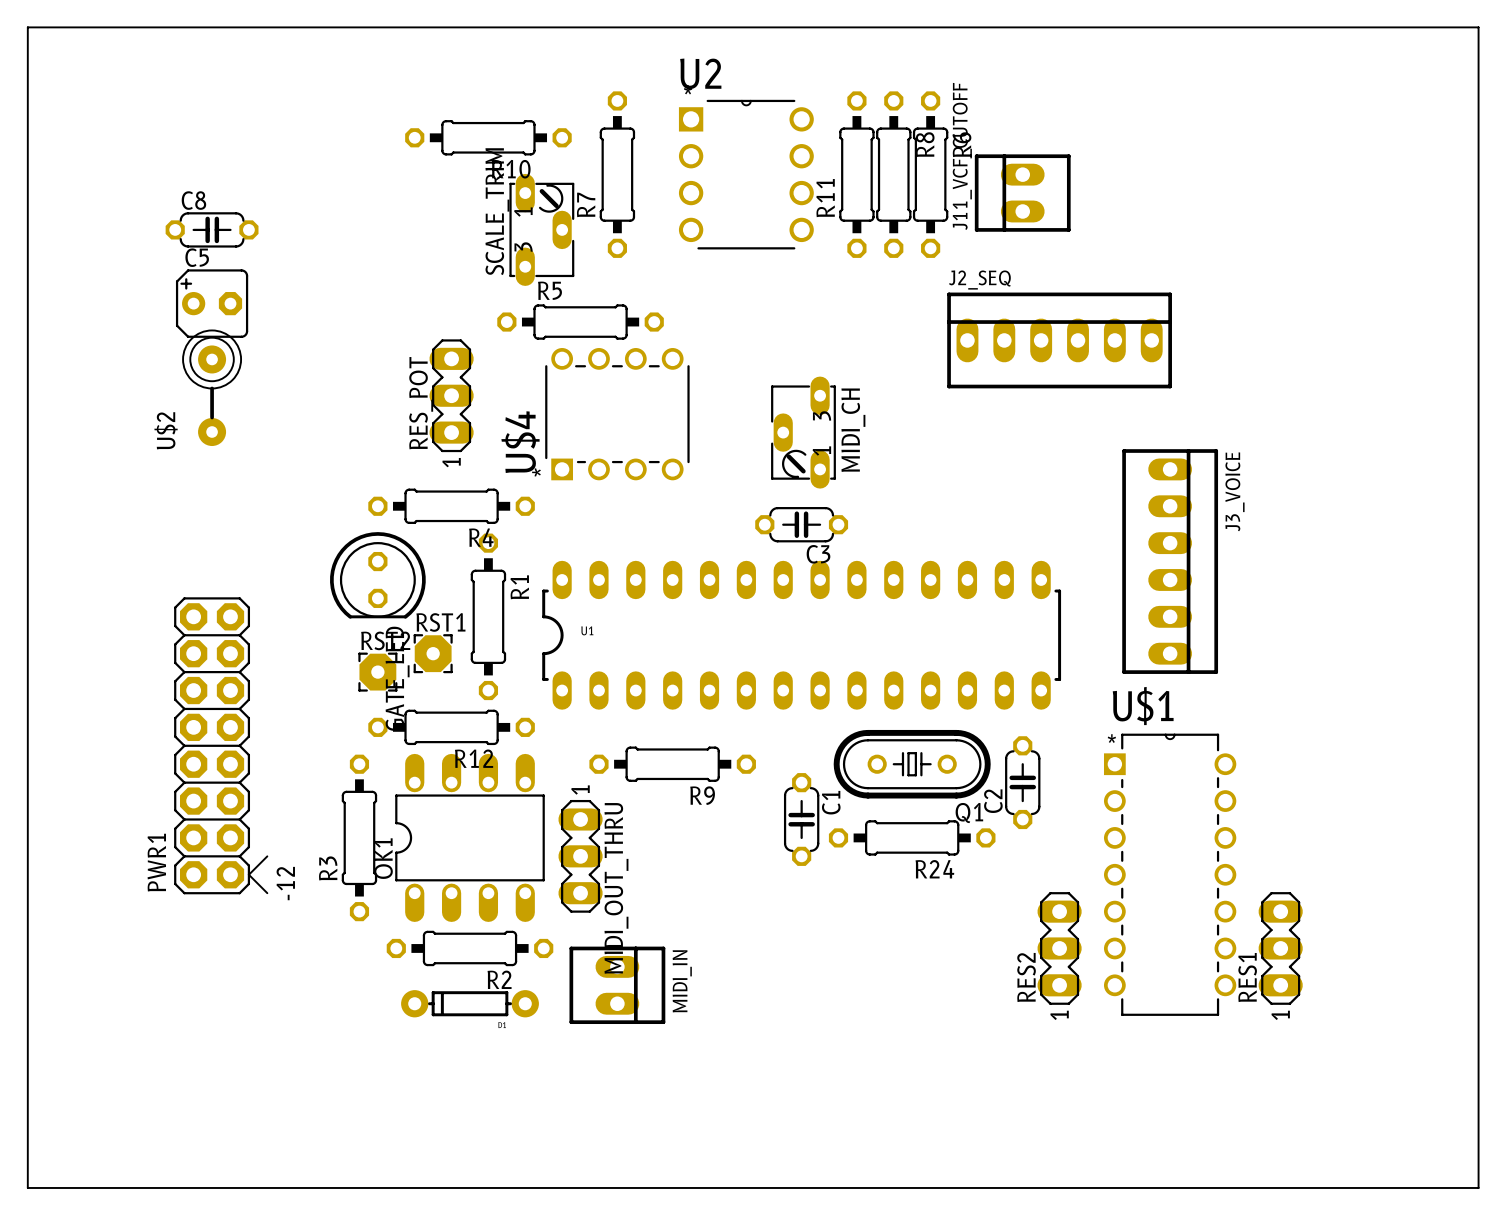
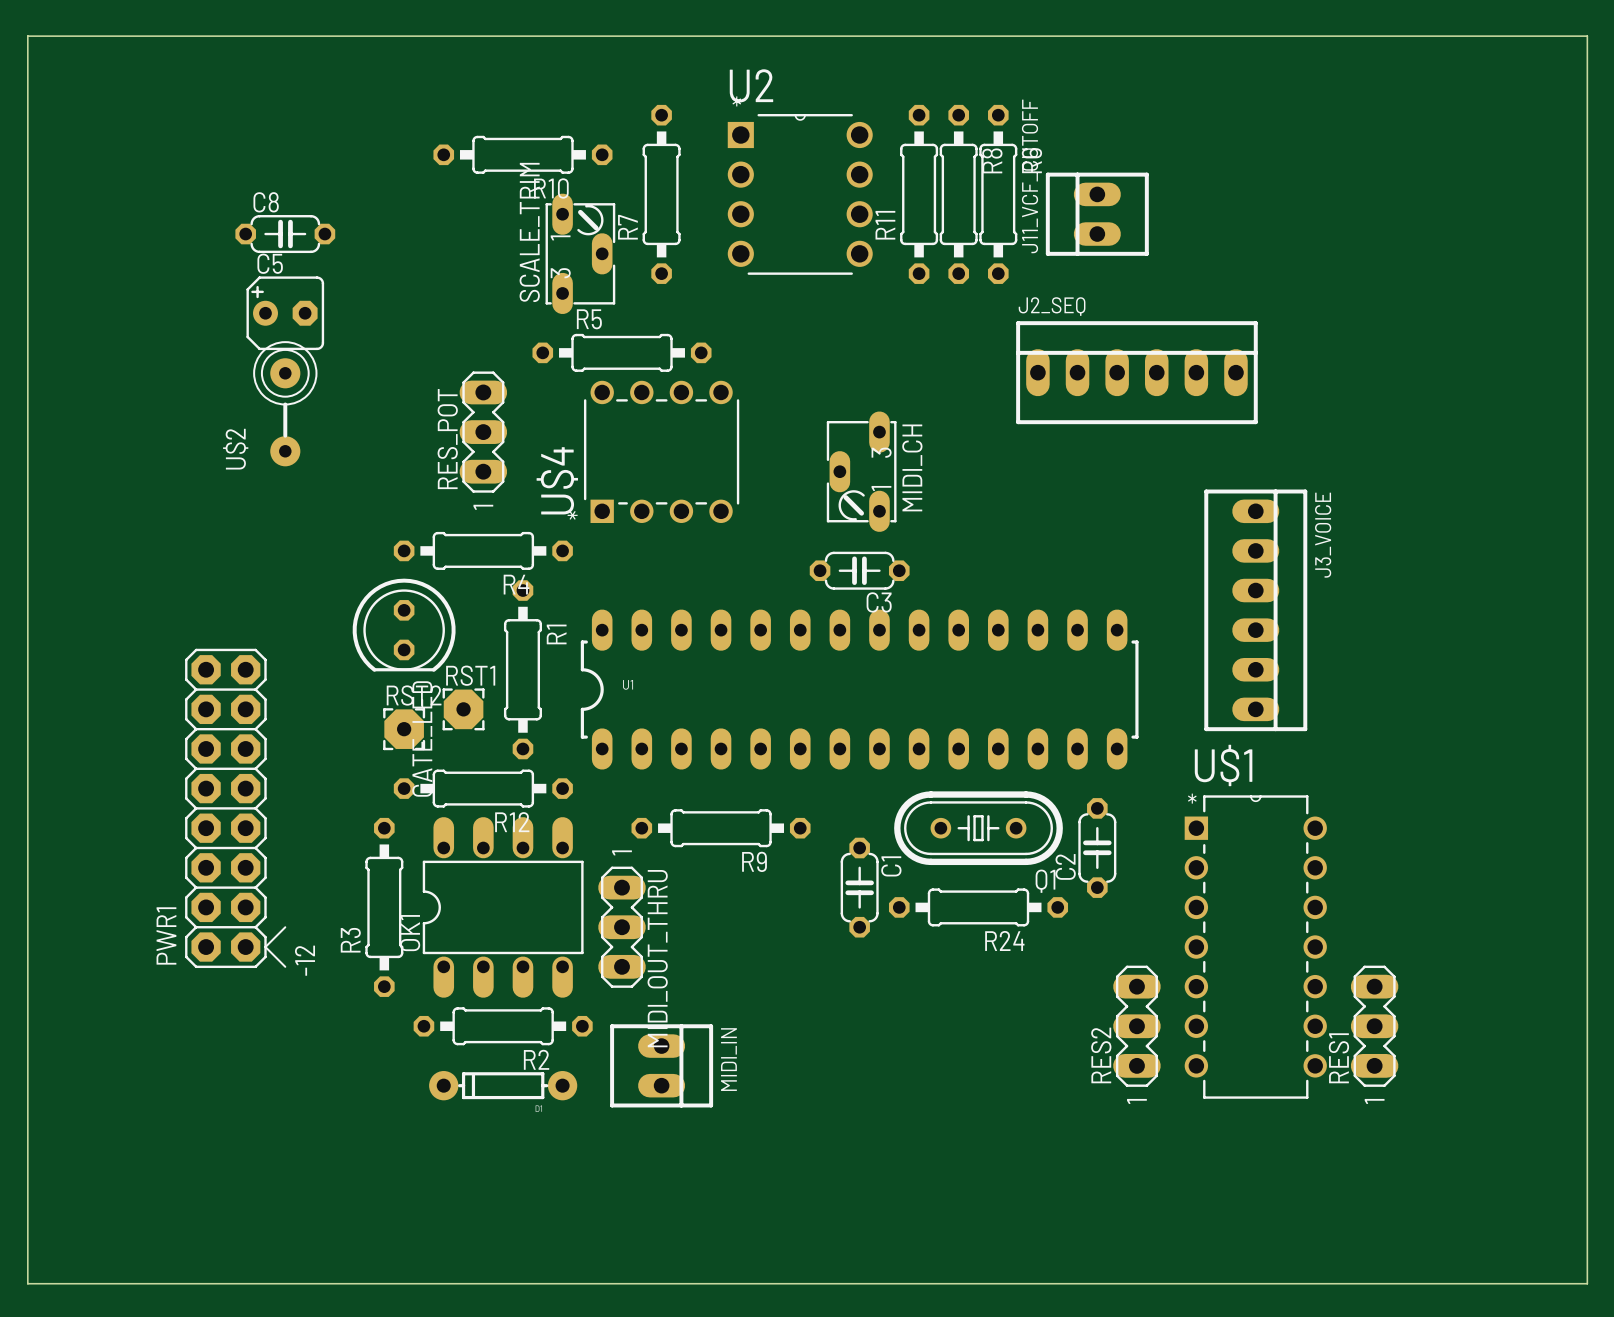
C8 position: (212, 229) -> (285, 234)
C5 position: (212, 303) -> (285, 313)
U$2 position: (212, 387) -> (285, 403)

